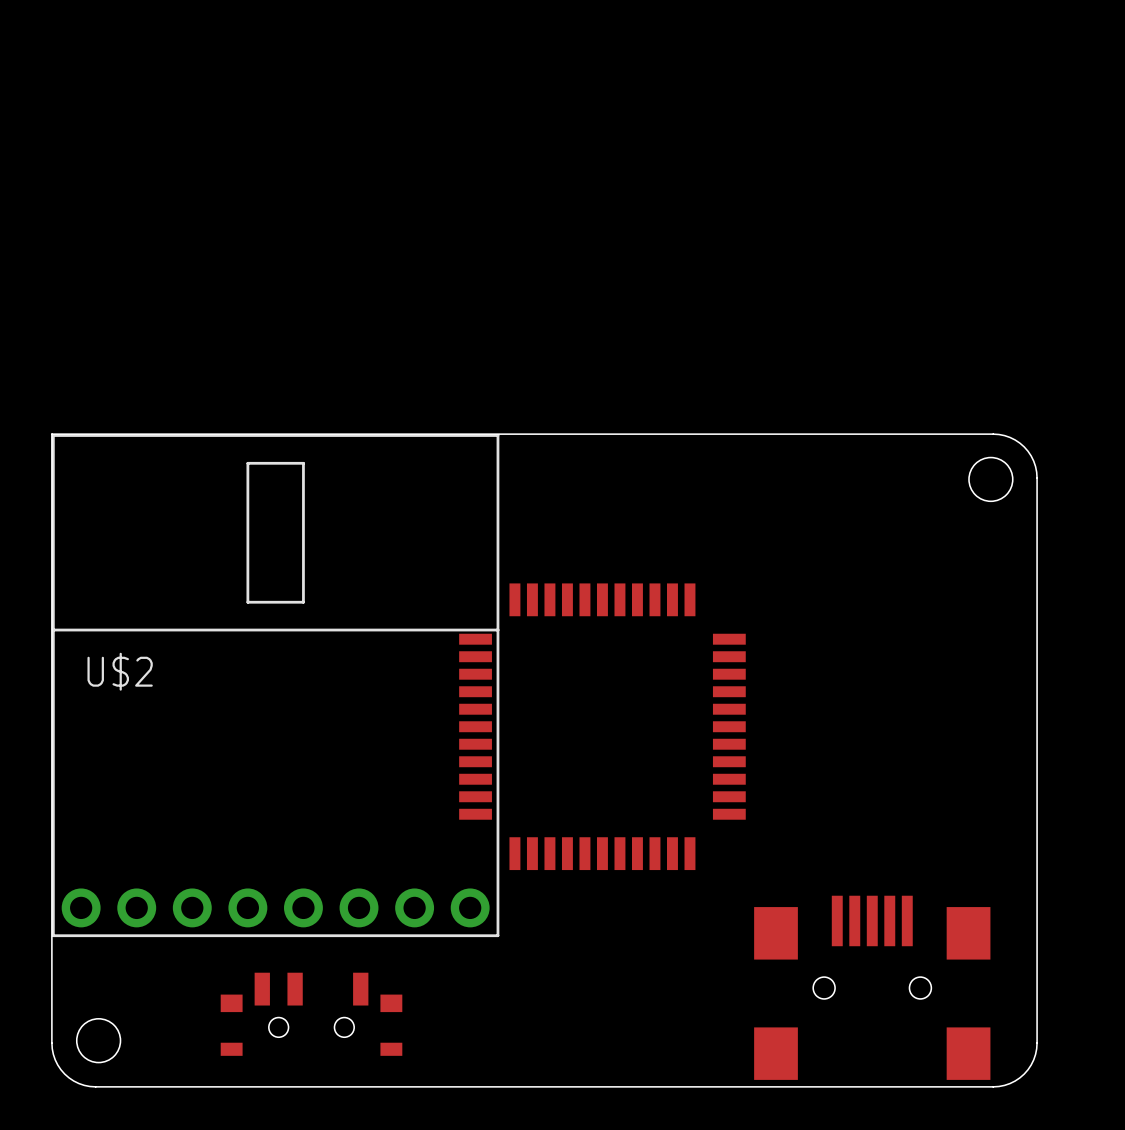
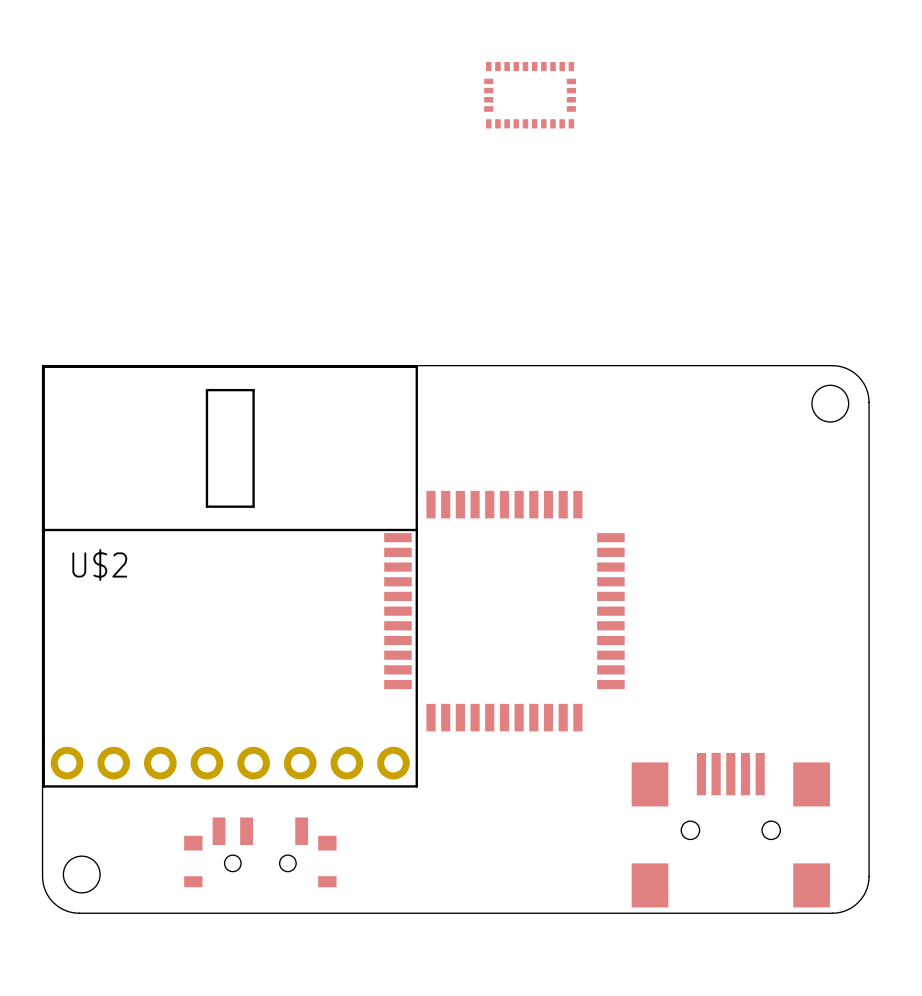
part: none -> (530, 95)

